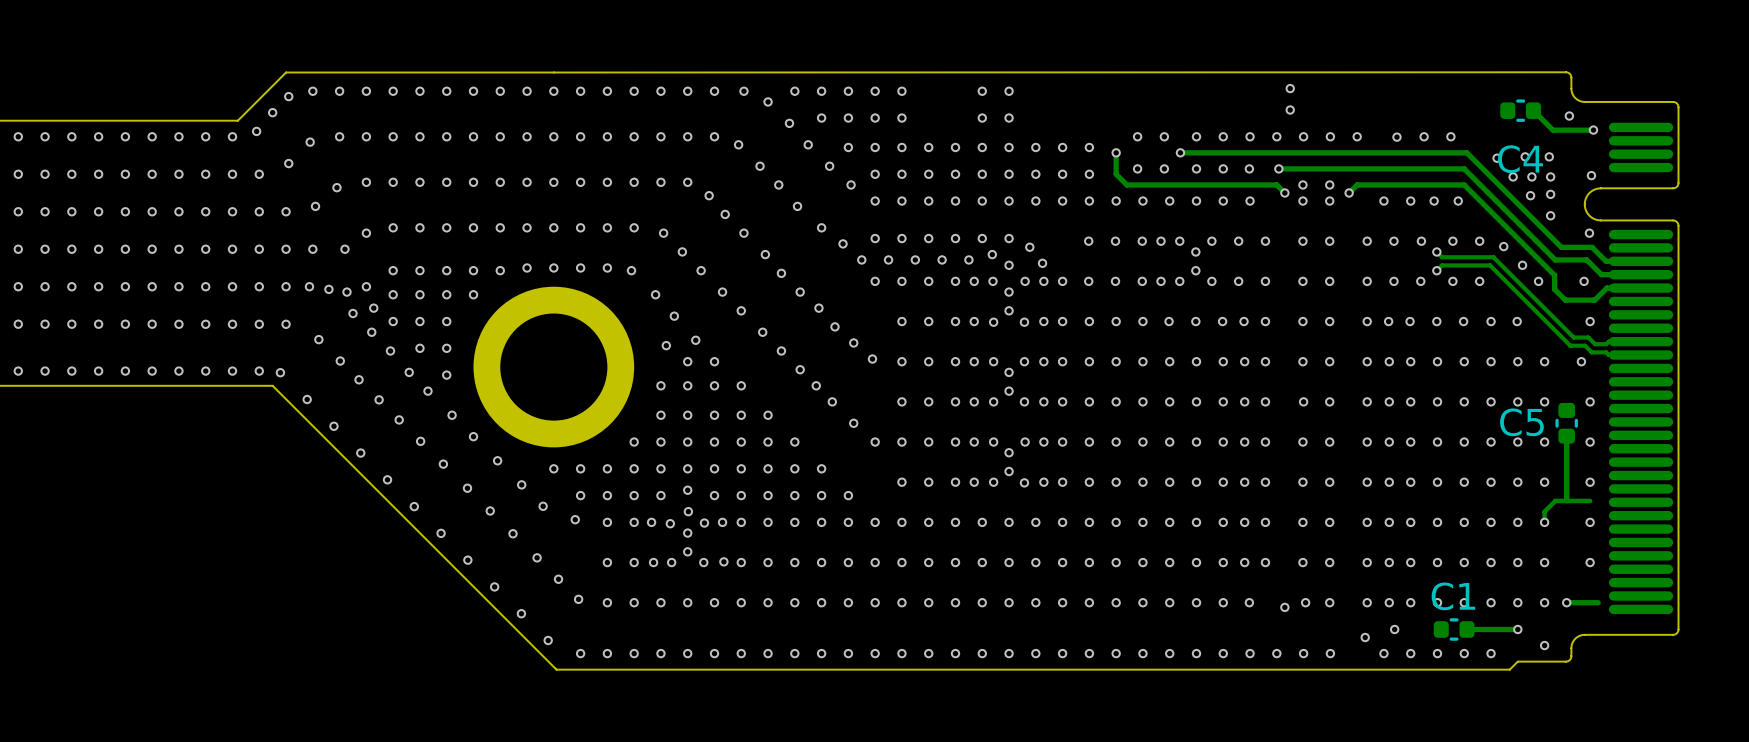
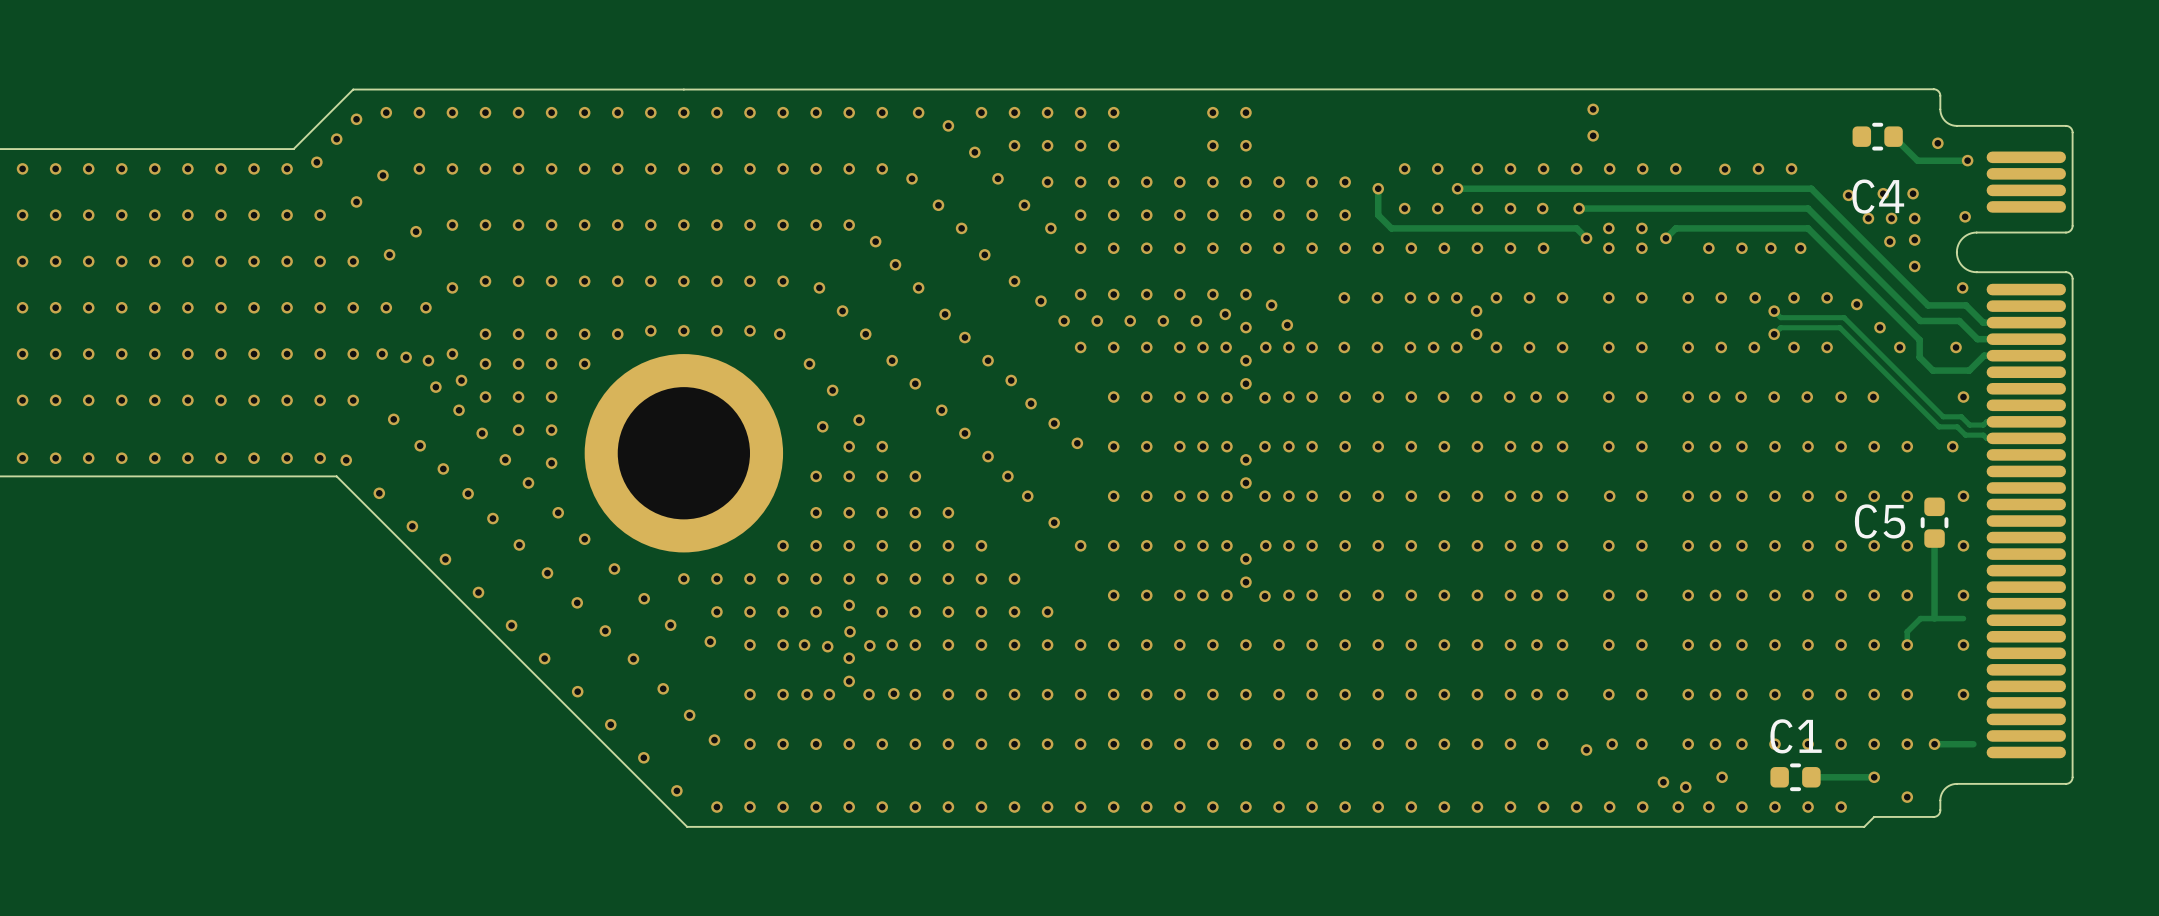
via: none -> (1663, 782)
via: none -> (1678, 807)

